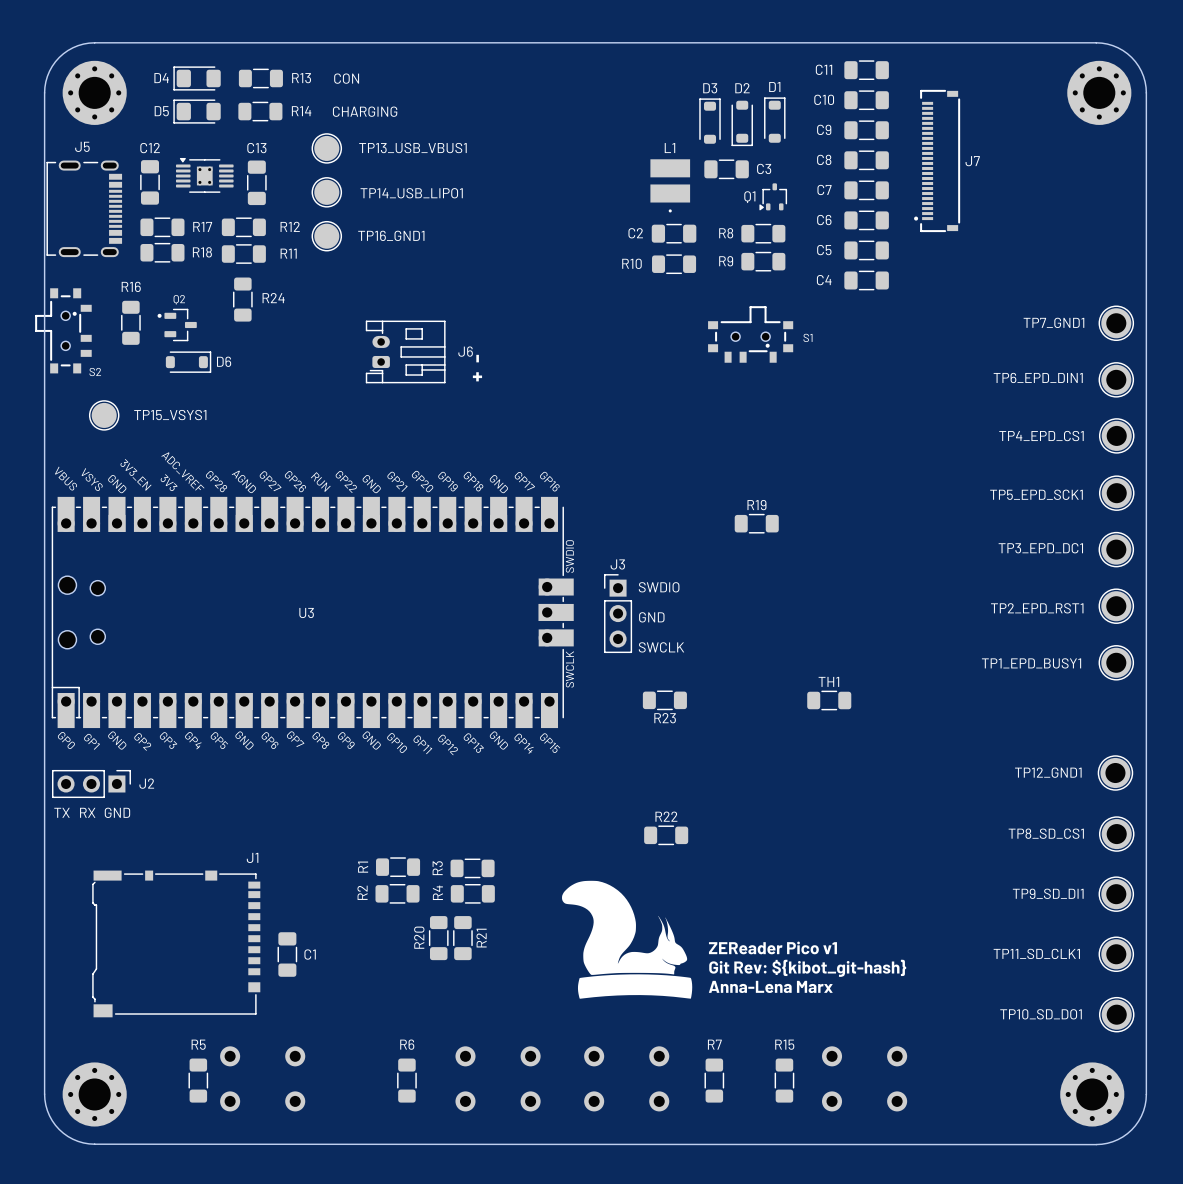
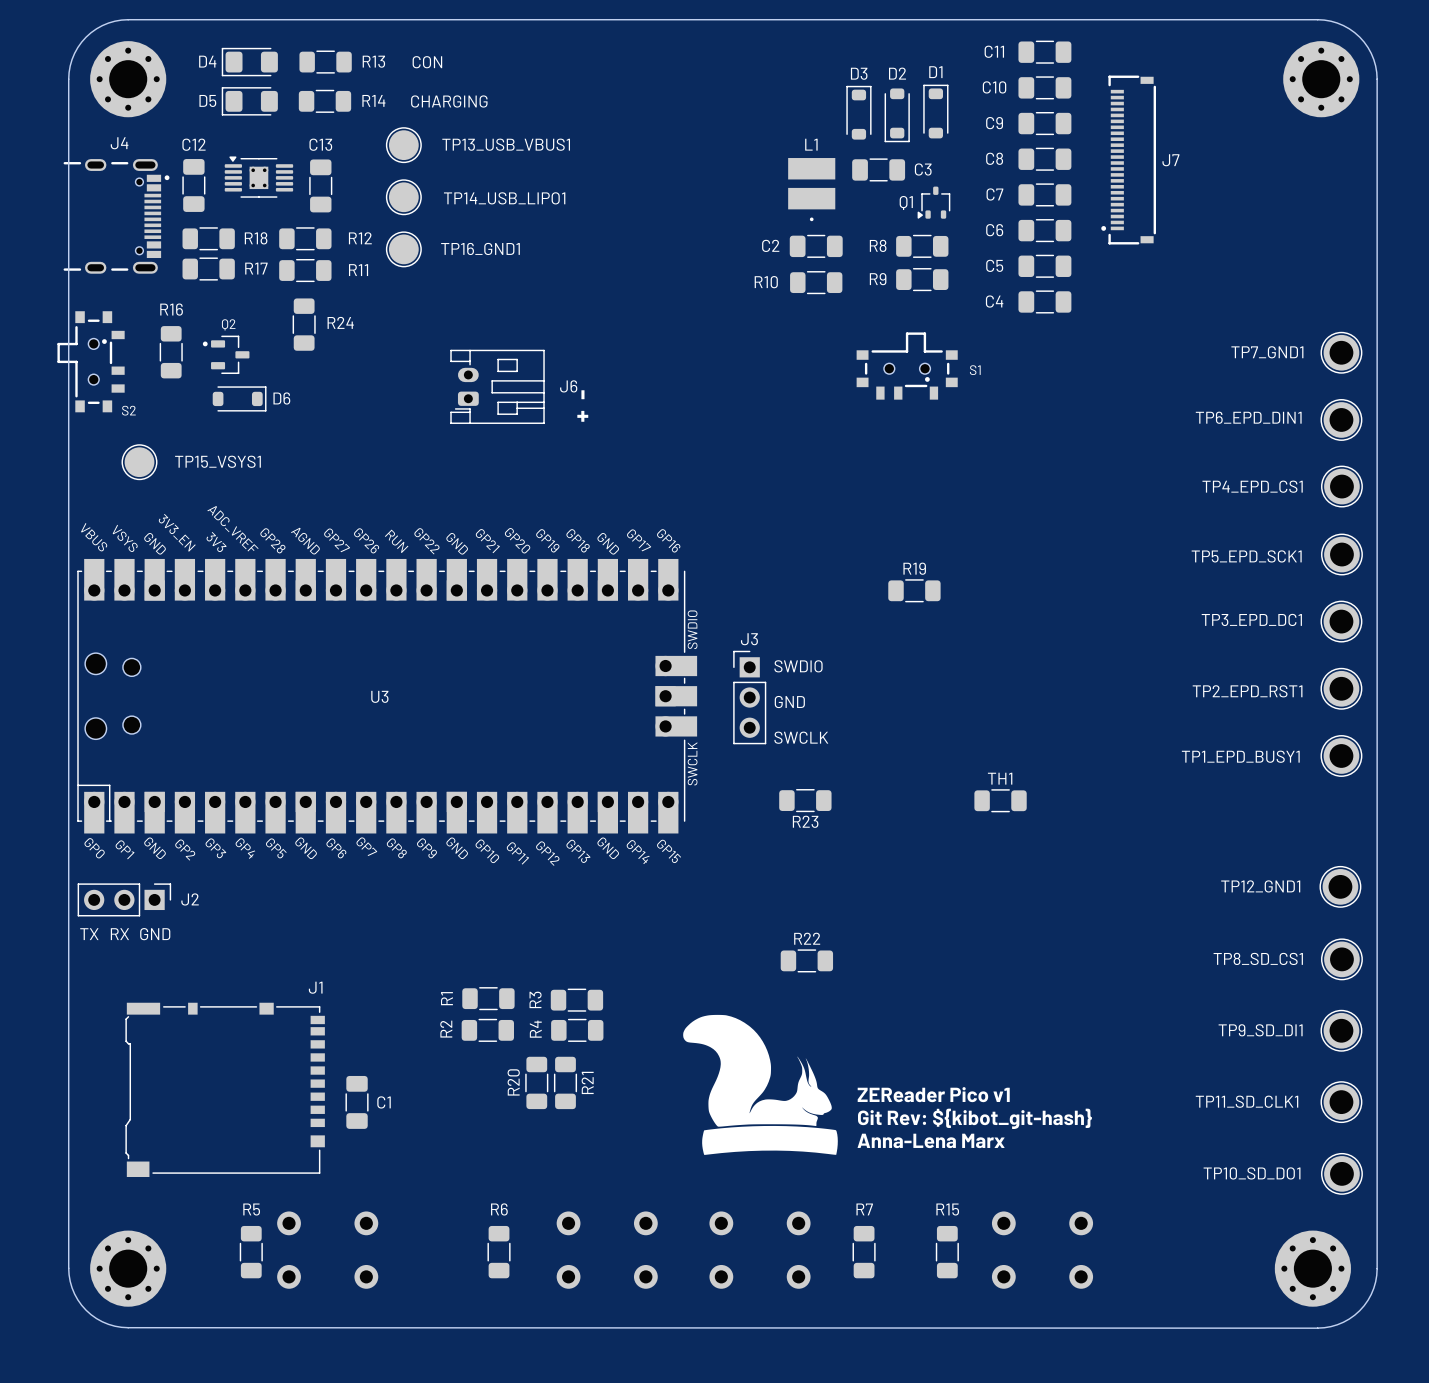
J5: (84, 208) -> none
J4: none -> (116, 216)
R17 name: R17 (202, 226) -> R18 (256, 238)
R18 name: R18 (202, 252) -> R17 (256, 268)

